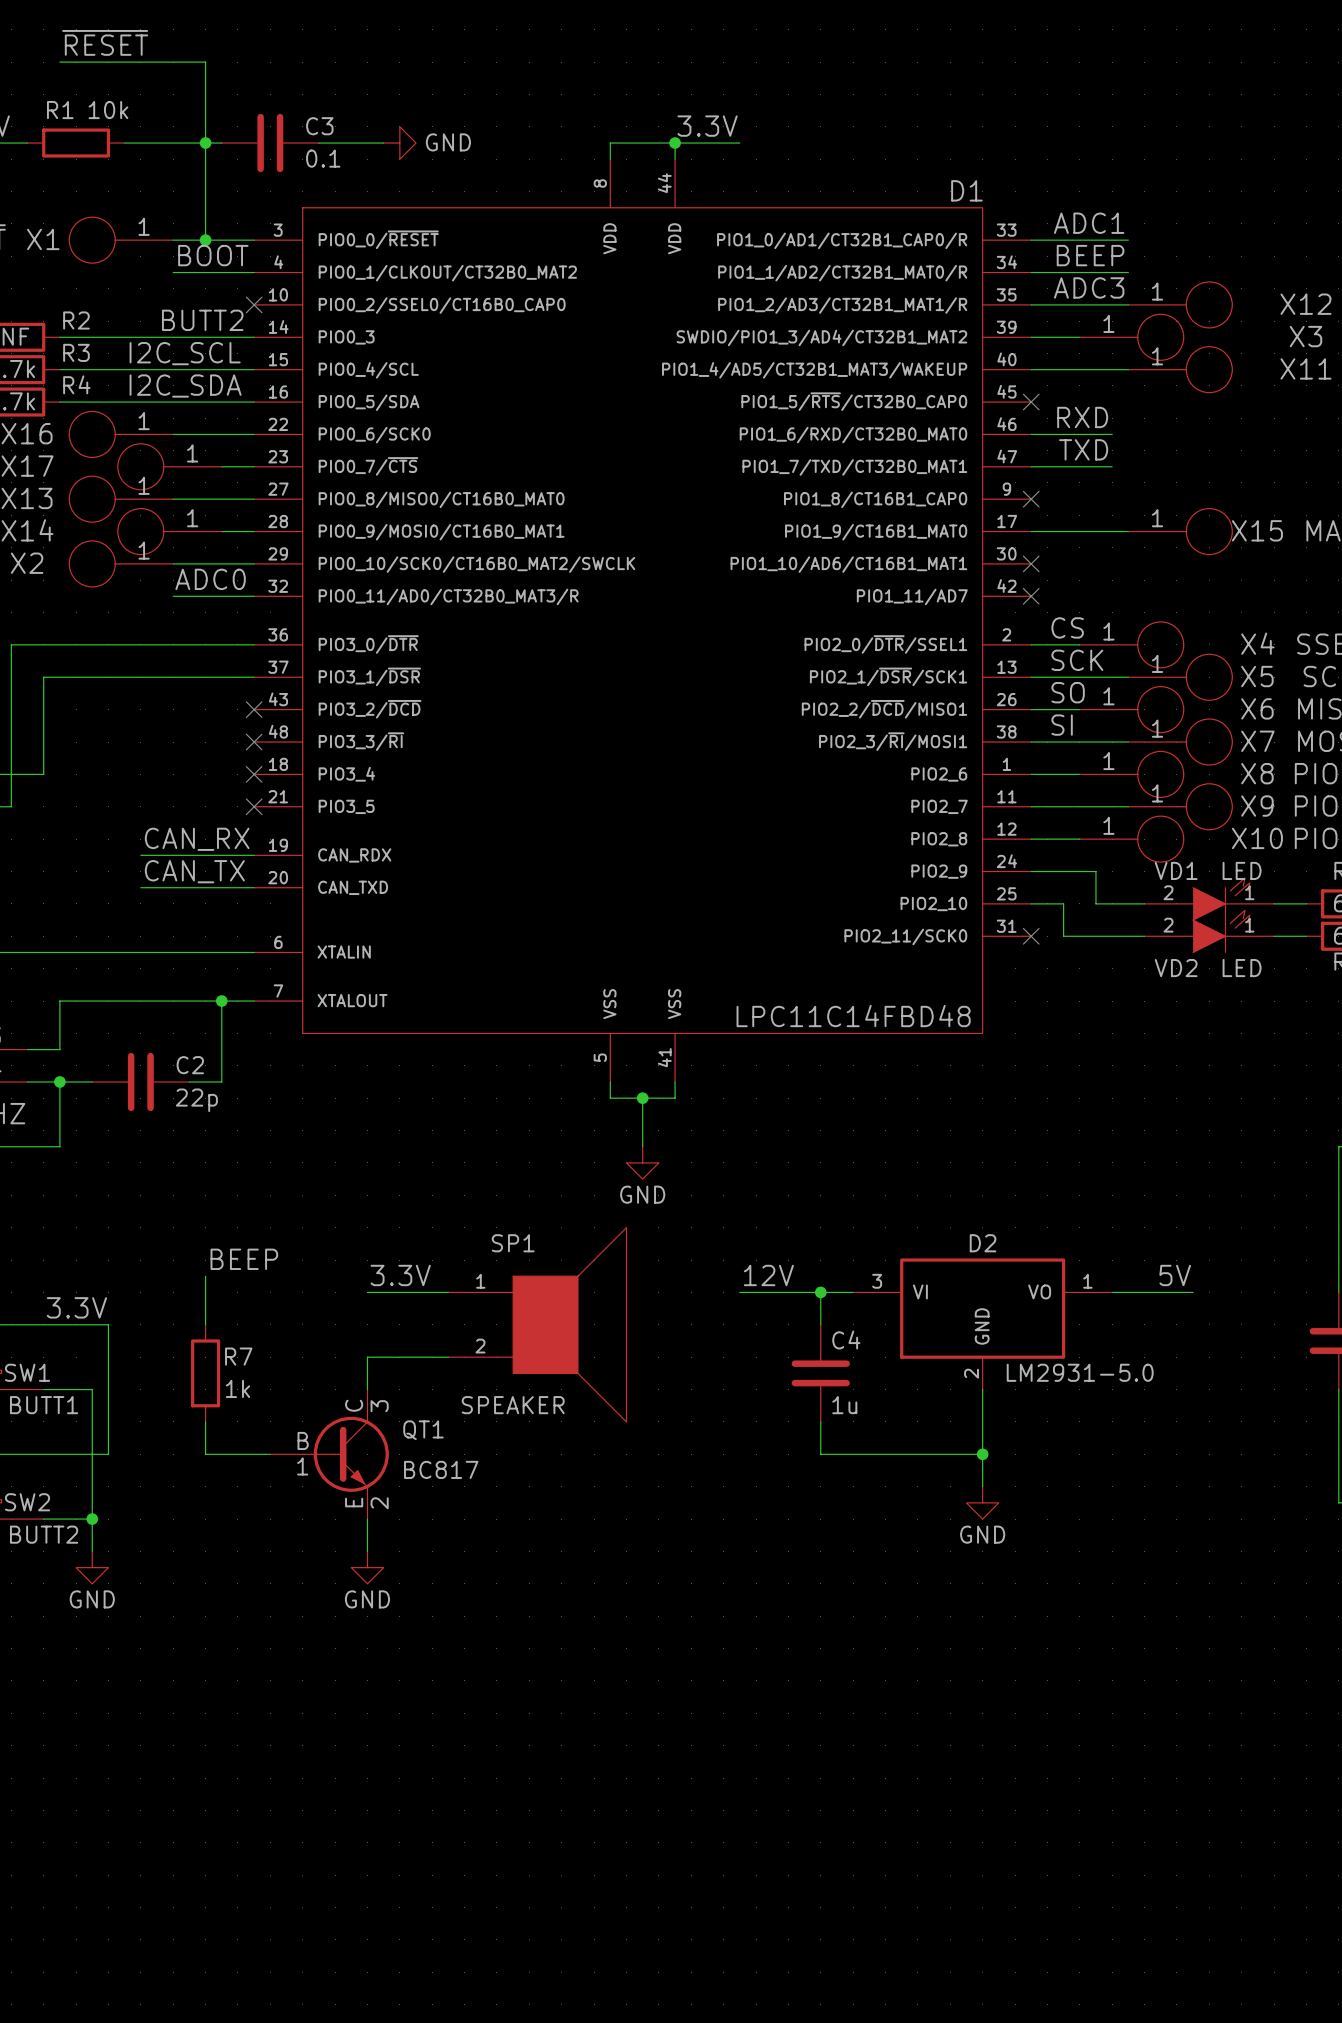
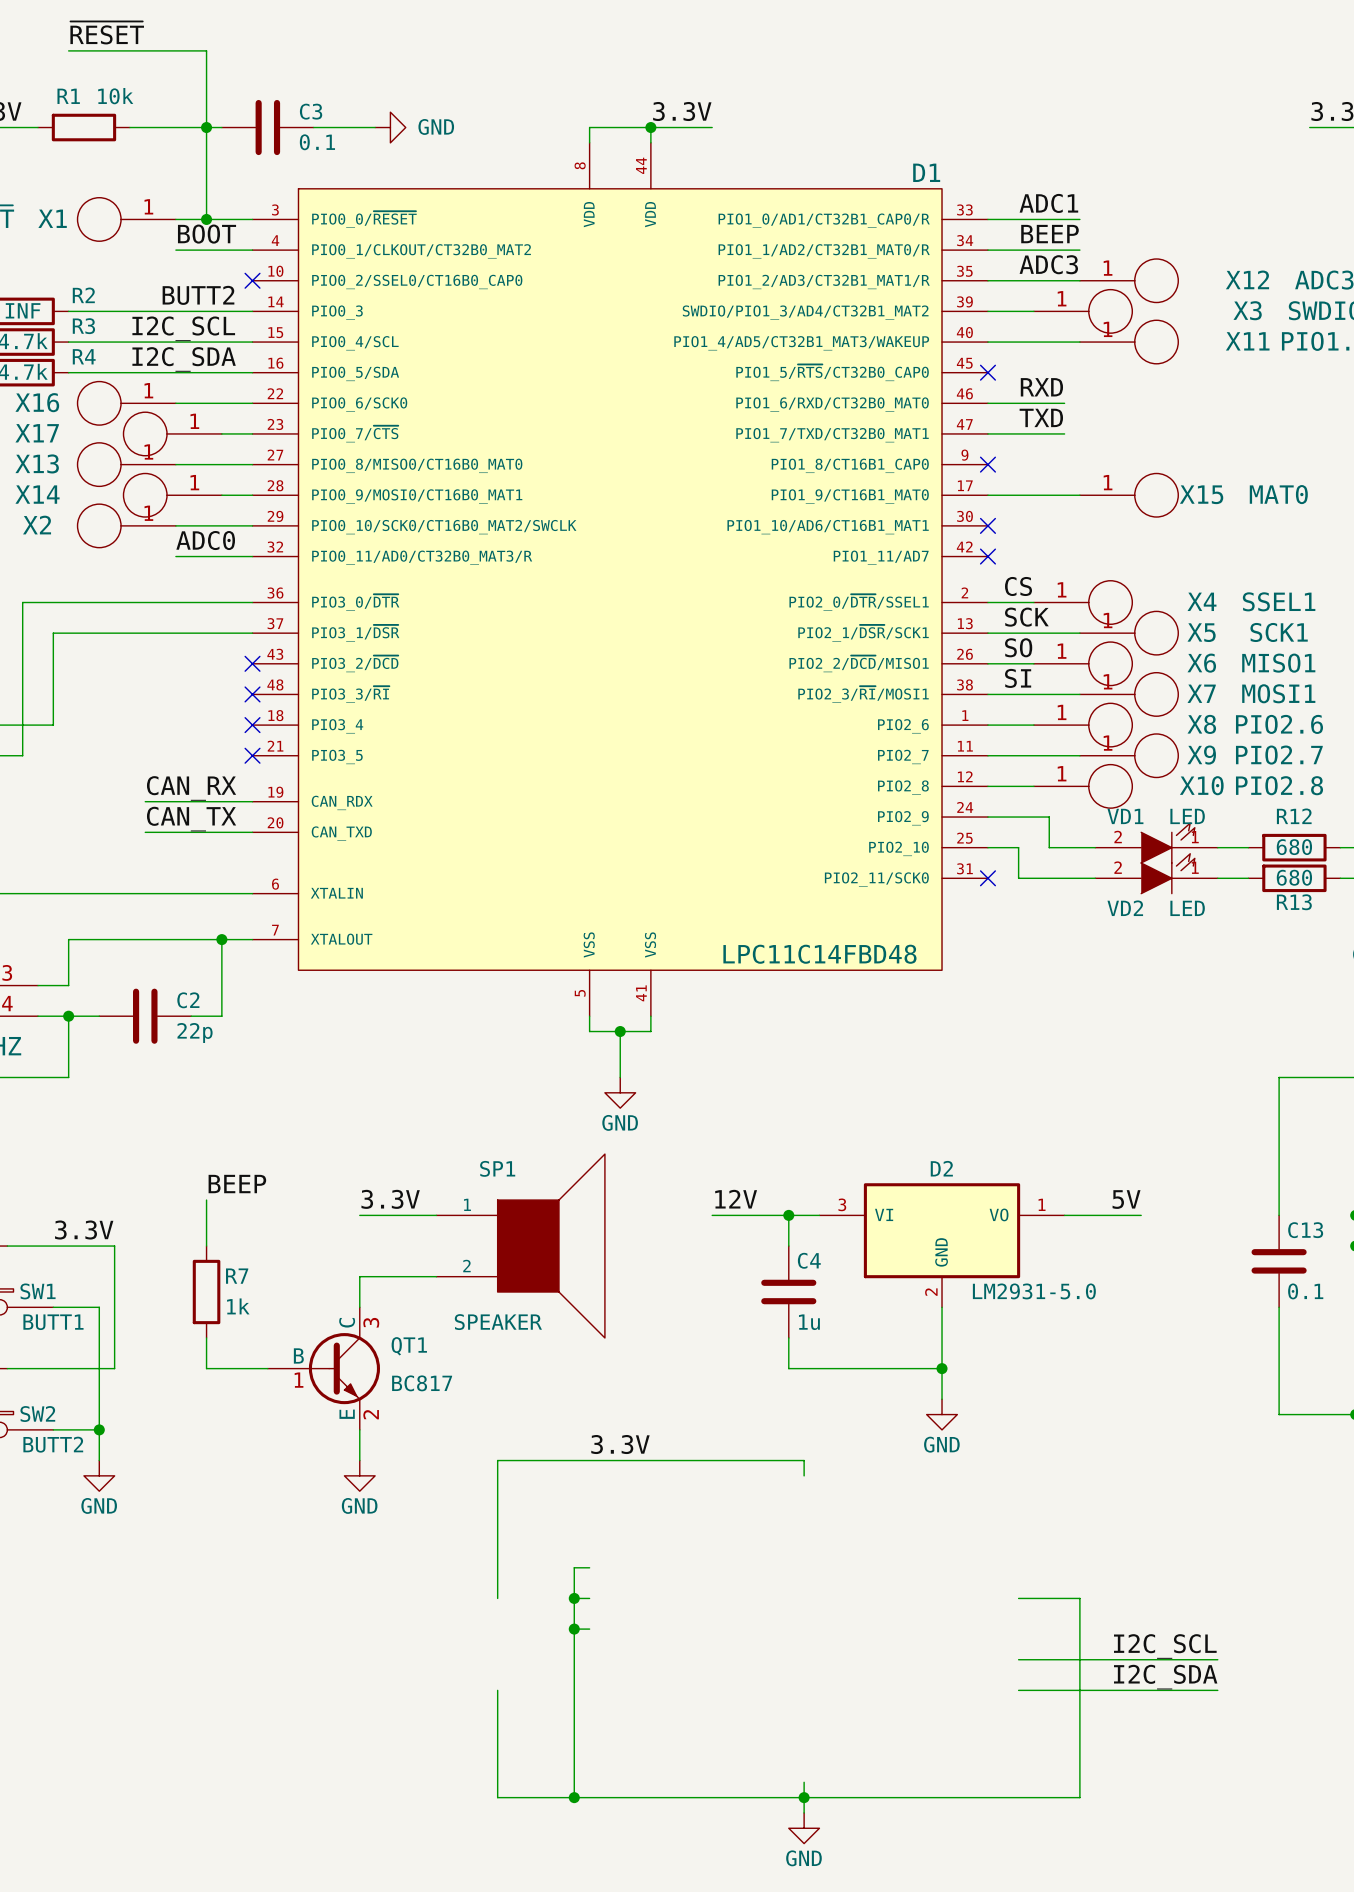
label: none -> 3.3V (620, 1444)
wire: none -> (804, 1475) (804, 1460) (497, 1460) (497, 1598)
wire: none -> (589, 1567) (574, 1567) (574, 1797)
wire: none -> (574, 1598) (589, 1598)
junction: none -> (574, 1598)
wire: none -> (1018, 1598) (1079, 1598) (1079, 1797) (497, 1797) (497, 1690)
wire: none -> (574, 1629) (589, 1629)
junction: none -> (574, 1629)
label: none -> I2C_SCL (1165, 1646)
wire: none -> (1018, 1659) (1217, 1659)
label: none -> I2C_SDA (1165, 1677)
wire: none -> (1018, 1690) (1217, 1690)
wire: none -> (804, 1782) (804, 1812)
junction: none -> (574, 1797)
junction: none -> (804, 1797)
power symbol: none -> GND (804, 1828)

